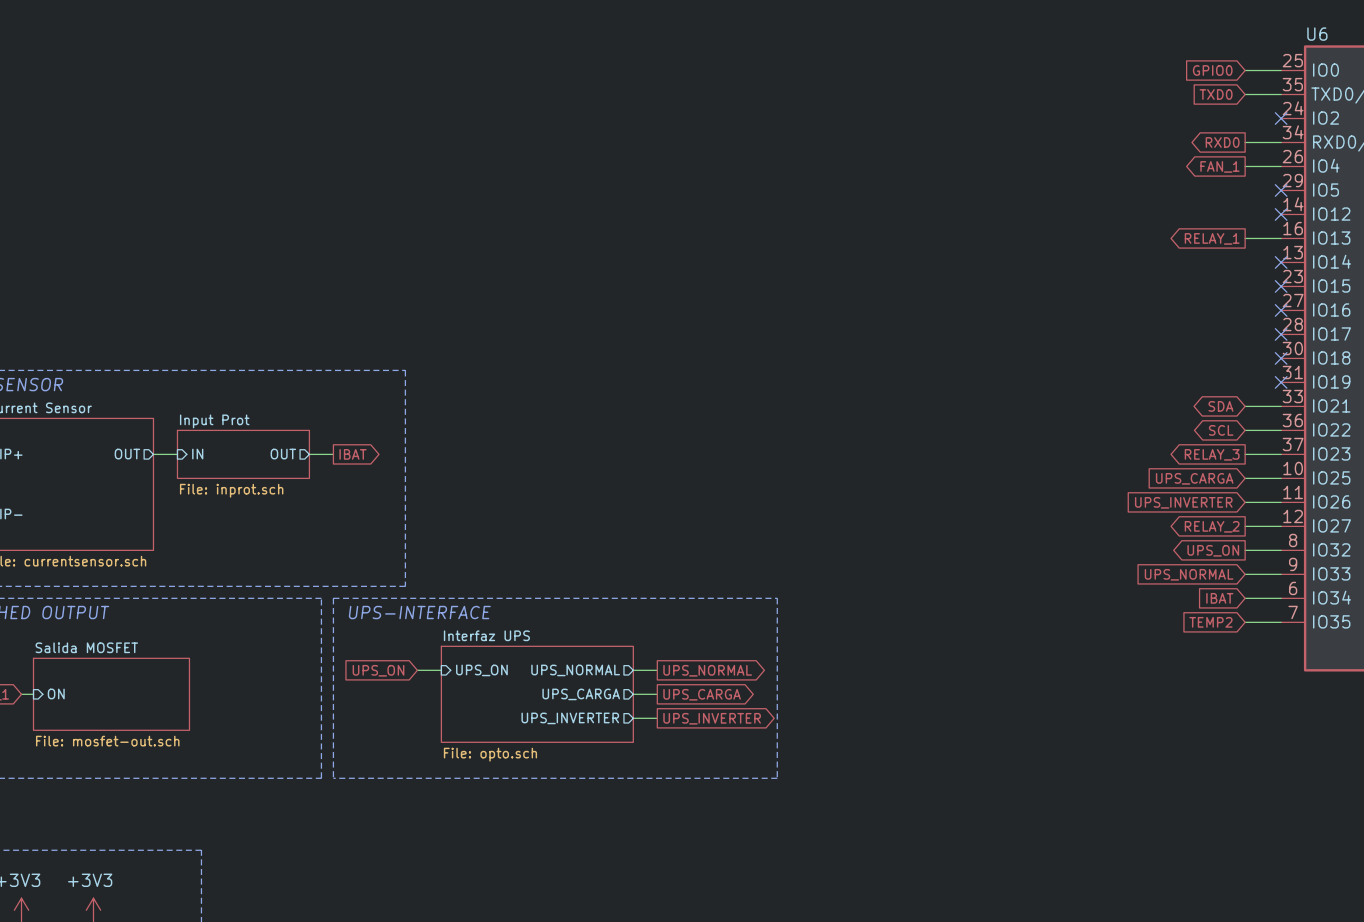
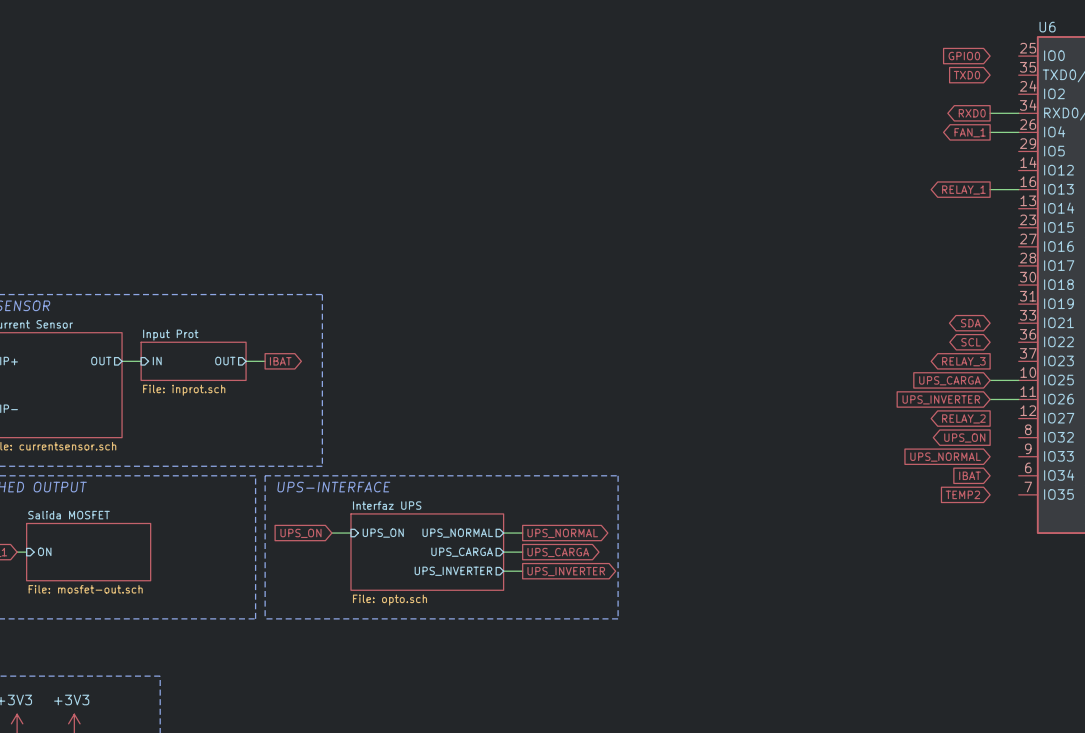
wire: (1245, 70) (1281, 70) -> none
wire: (1245, 94) (1281, 94) -> none
no-connect mark: (1281, 118) -> none
no-connect mark: (1281, 190) -> none
no-connect mark: (1281, 214) -> none
no-connect mark: (1281, 262) -> none
no-connect mark: (1281, 286) -> none
no-connect mark: (1281, 310) -> none
no-connect mark: (1281, 334) -> none
no-connect mark: (1281, 358) -> none
no-connect mark: (1281, 382) -> none
wire: (1245, 406) (1281, 406) -> none
wire: (1245, 430) (1281, 430) -> none
wire: (1245, 454) (1281, 454) -> none
wire: (1245, 526) (1281, 526) -> none
wire: (1245, 550) (1281, 550) -> none
wire: (1245, 574) (1281, 574) -> none
wire: (1245, 598) (1281, 598) -> none
wire: (1245, 622) (1281, 622) -> none

